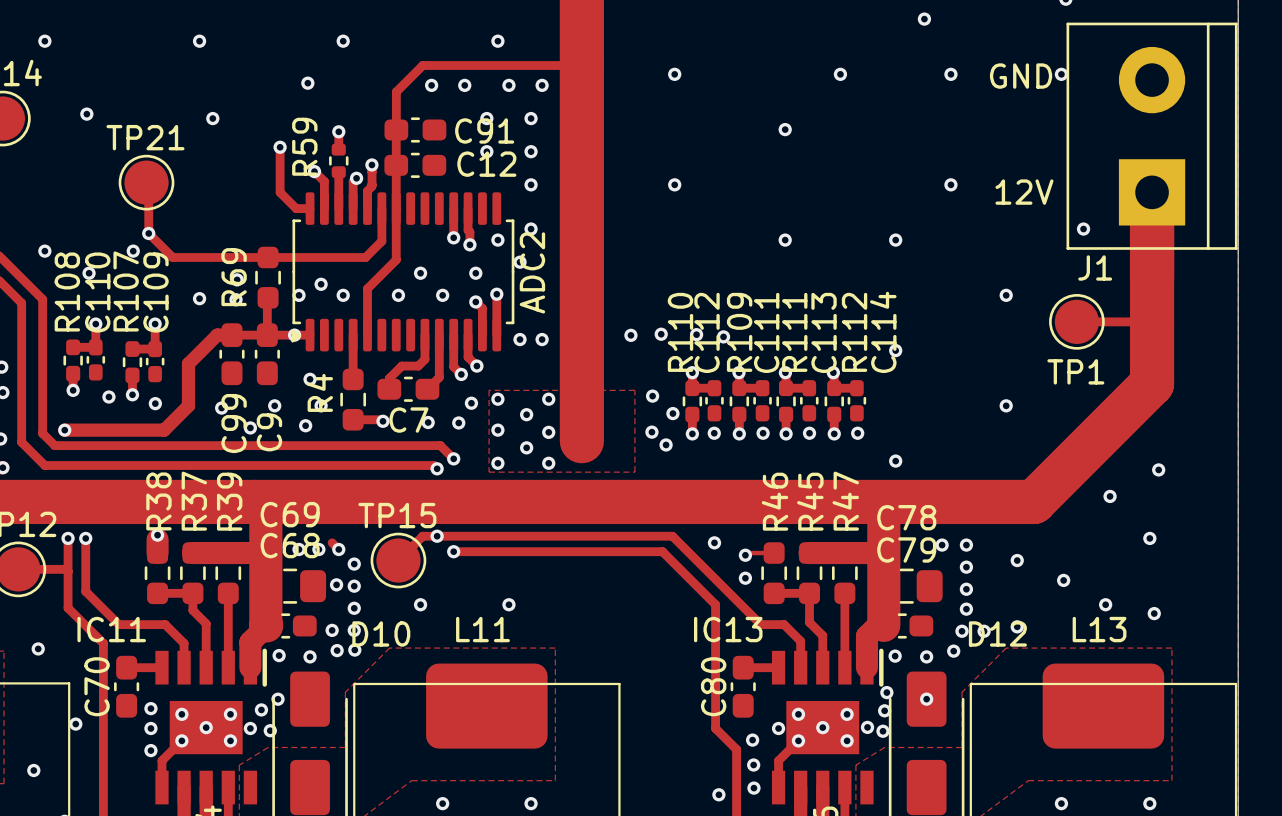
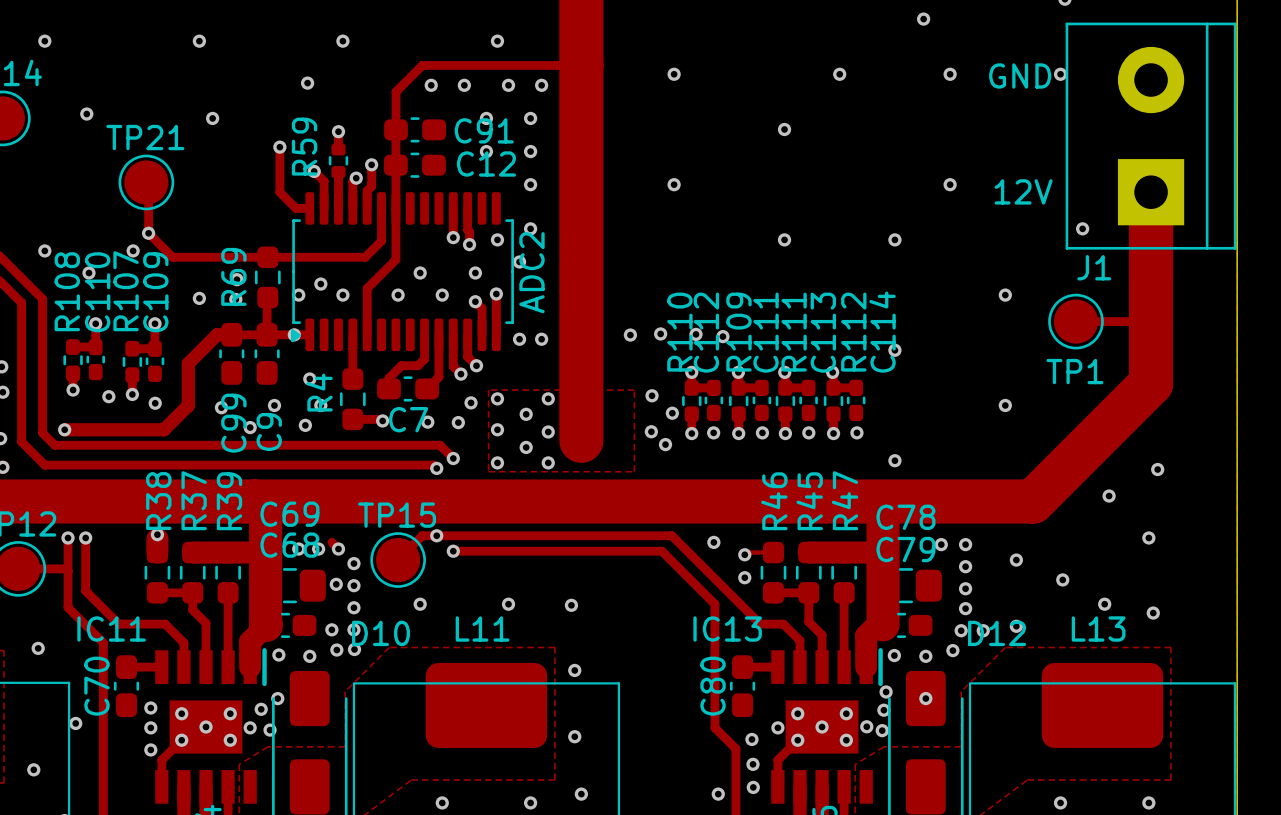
via: none -> (571, 605)
via: none -> (574, 670)
via: none -> (574, 736)
via: none -> (581, 794)

